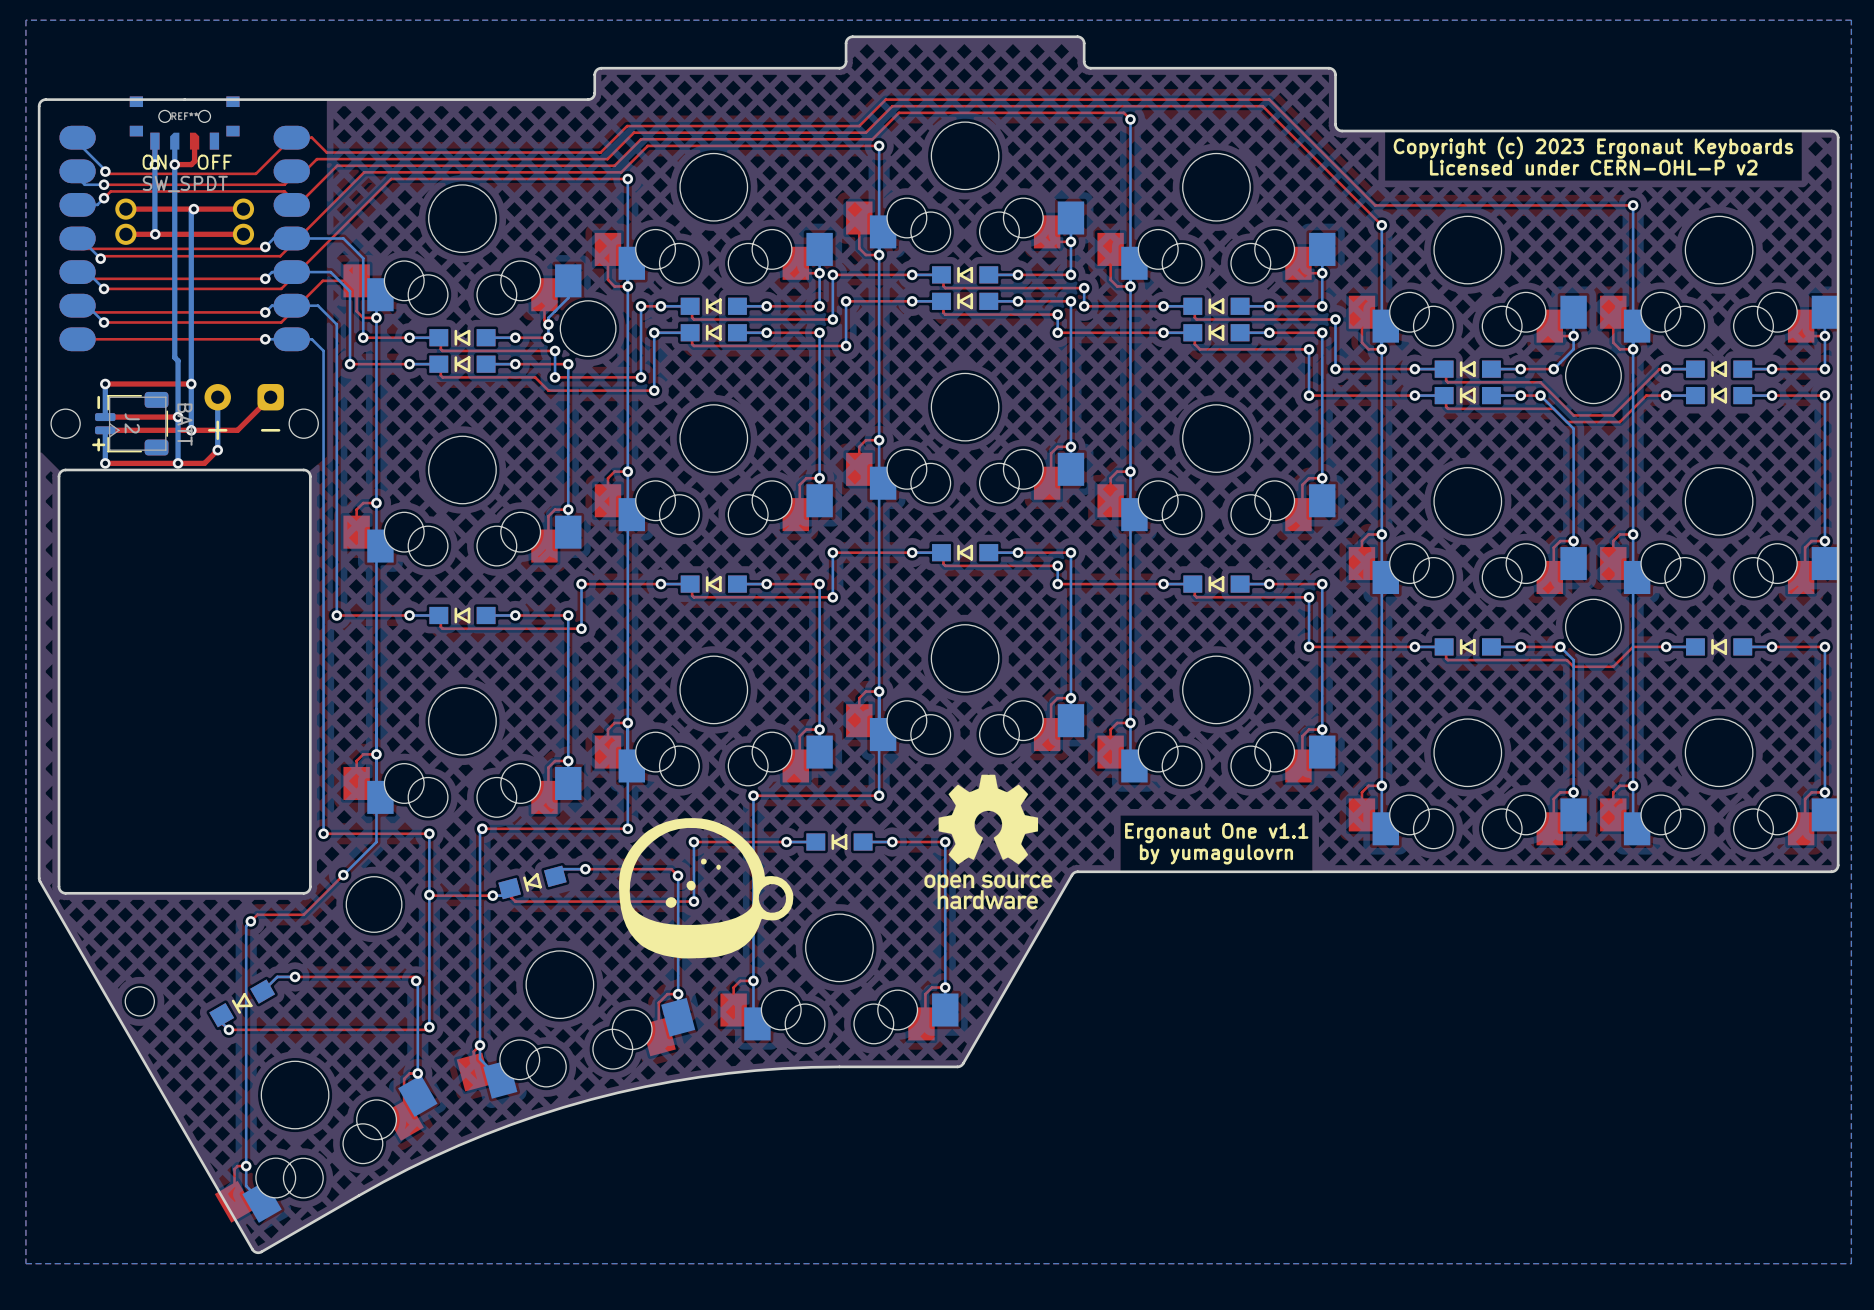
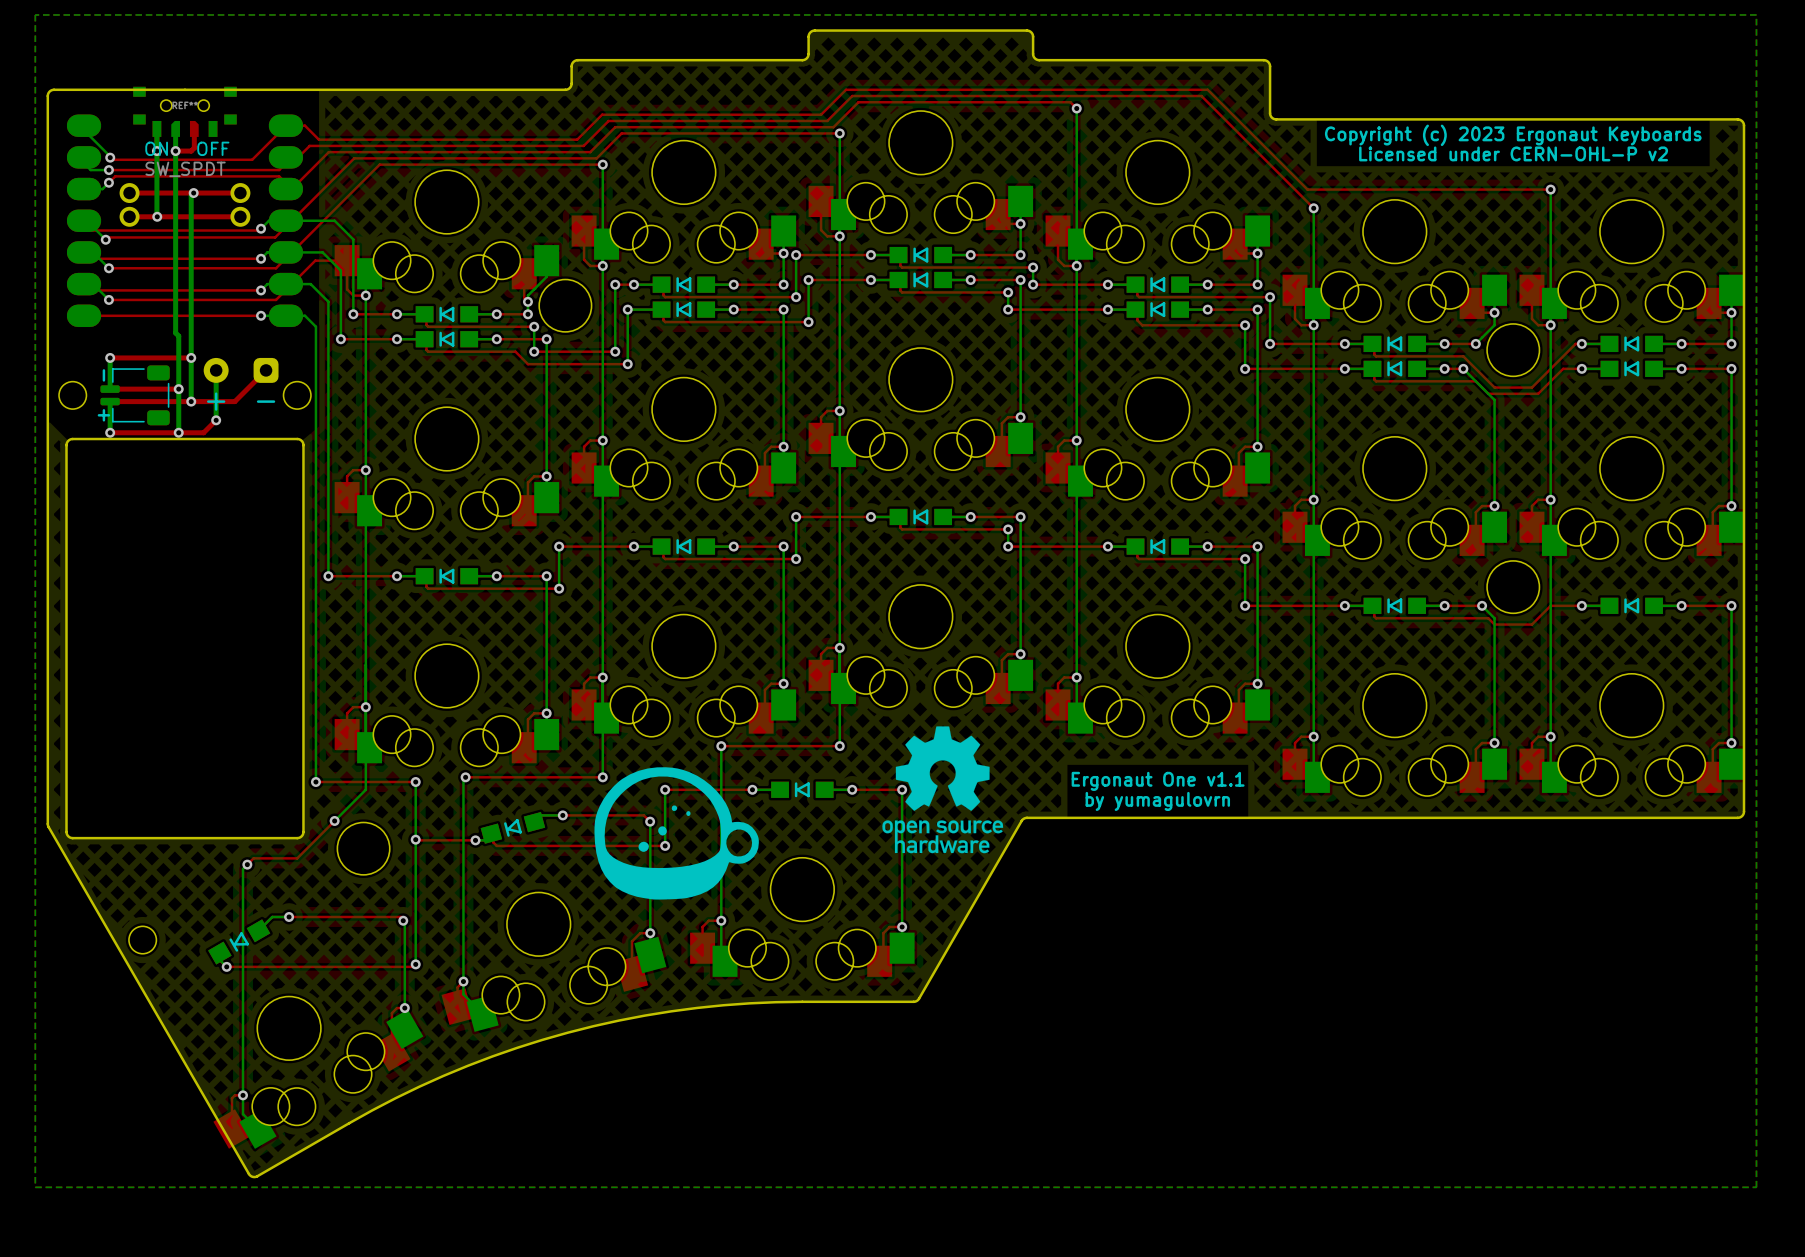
J2 side: bottom (130, 423) -> top (133, 395)

